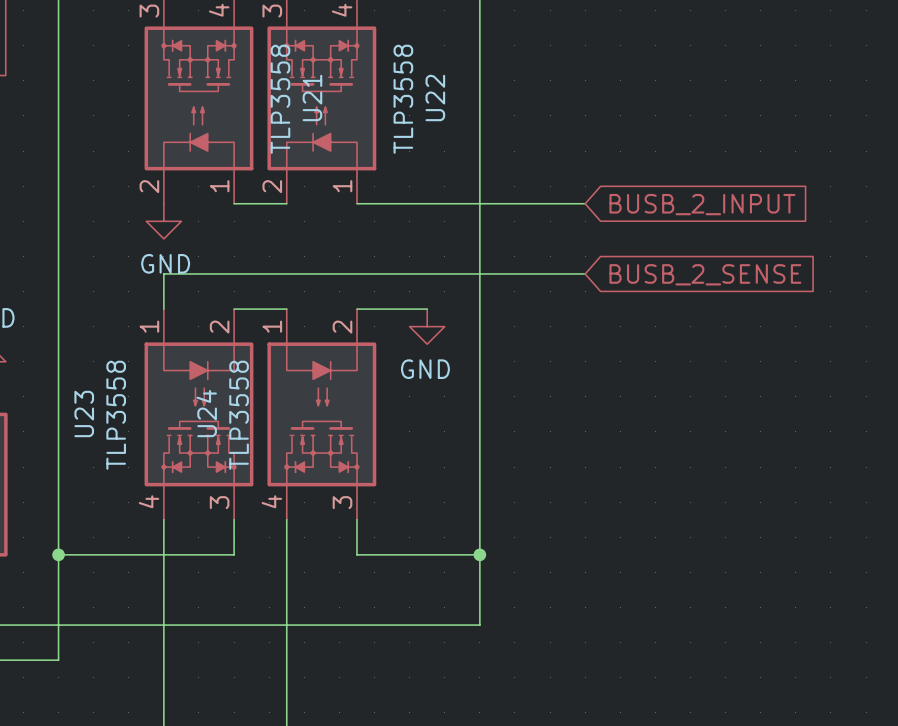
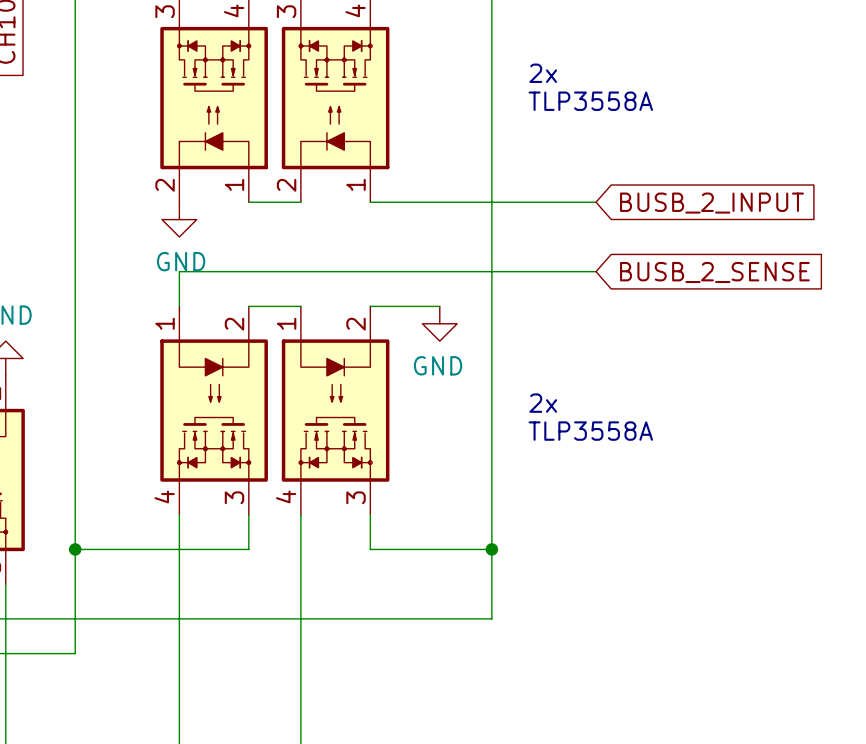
text: none -> 2x (543, 73)
U21 name: U21 (312, 98) -> none
U22 name: U22 (435, 98) -> none
U21 value: TLP3558 (280, 99) -> none
U22 value: TLP3558 (403, 99) -> none
text: none -> TLP3558A (590, 101)
text: none -> 2x (543, 403)
U23 name: U23 (84, 413) -> none
U24 name: U24 (206, 413) -> none
U23 value: TLP3558 (116, 415) -> none
U24 value: TLP3558 (239, 415) -> none
text: none -> TLP3558A (590, 431)

